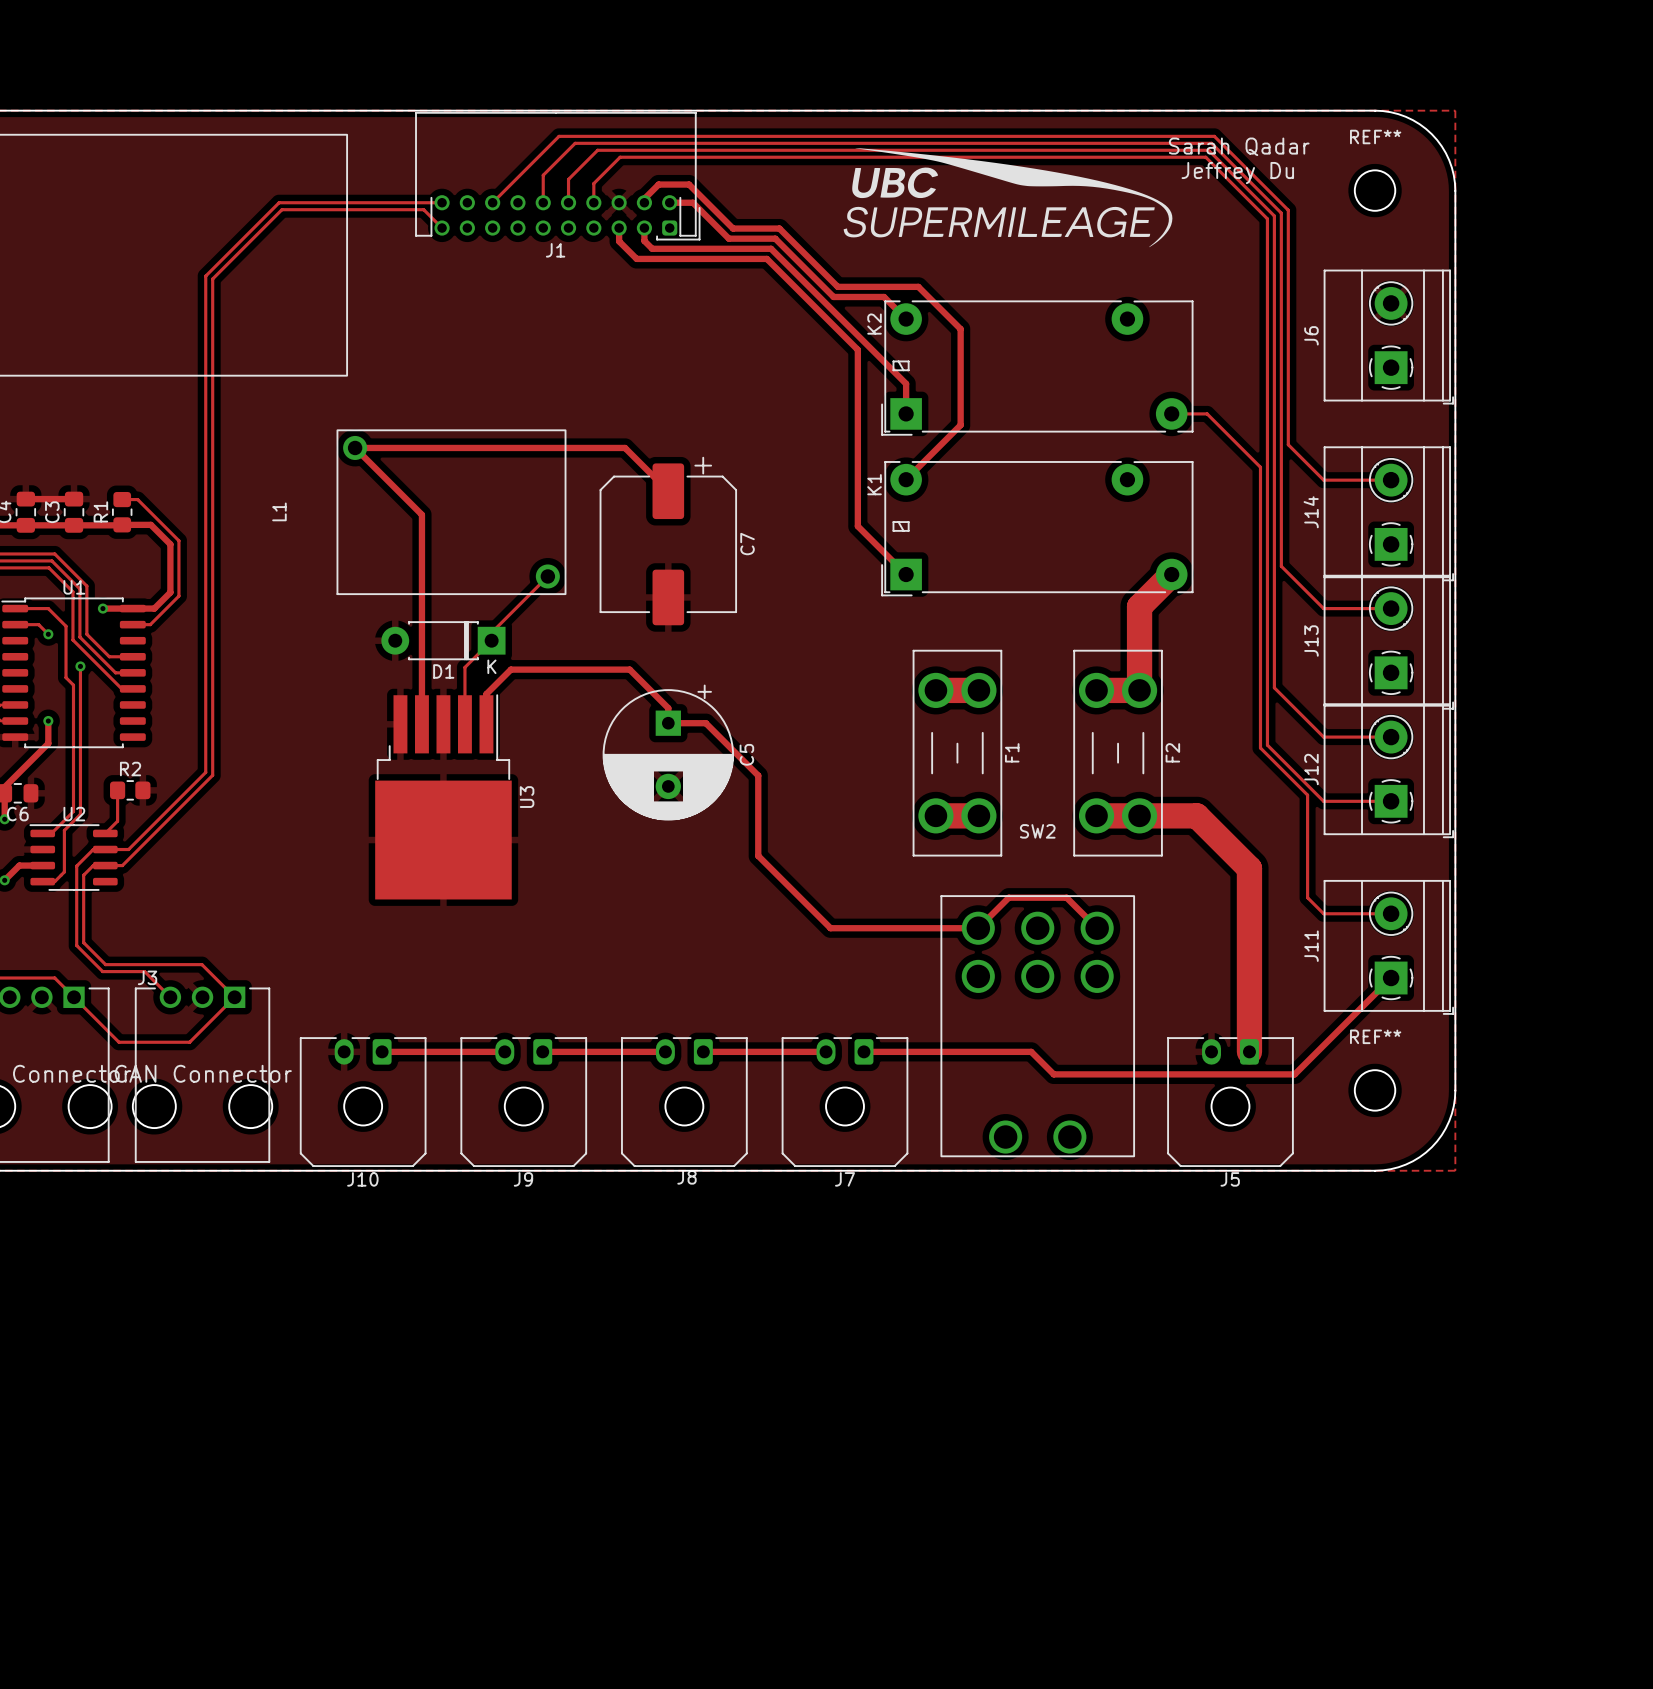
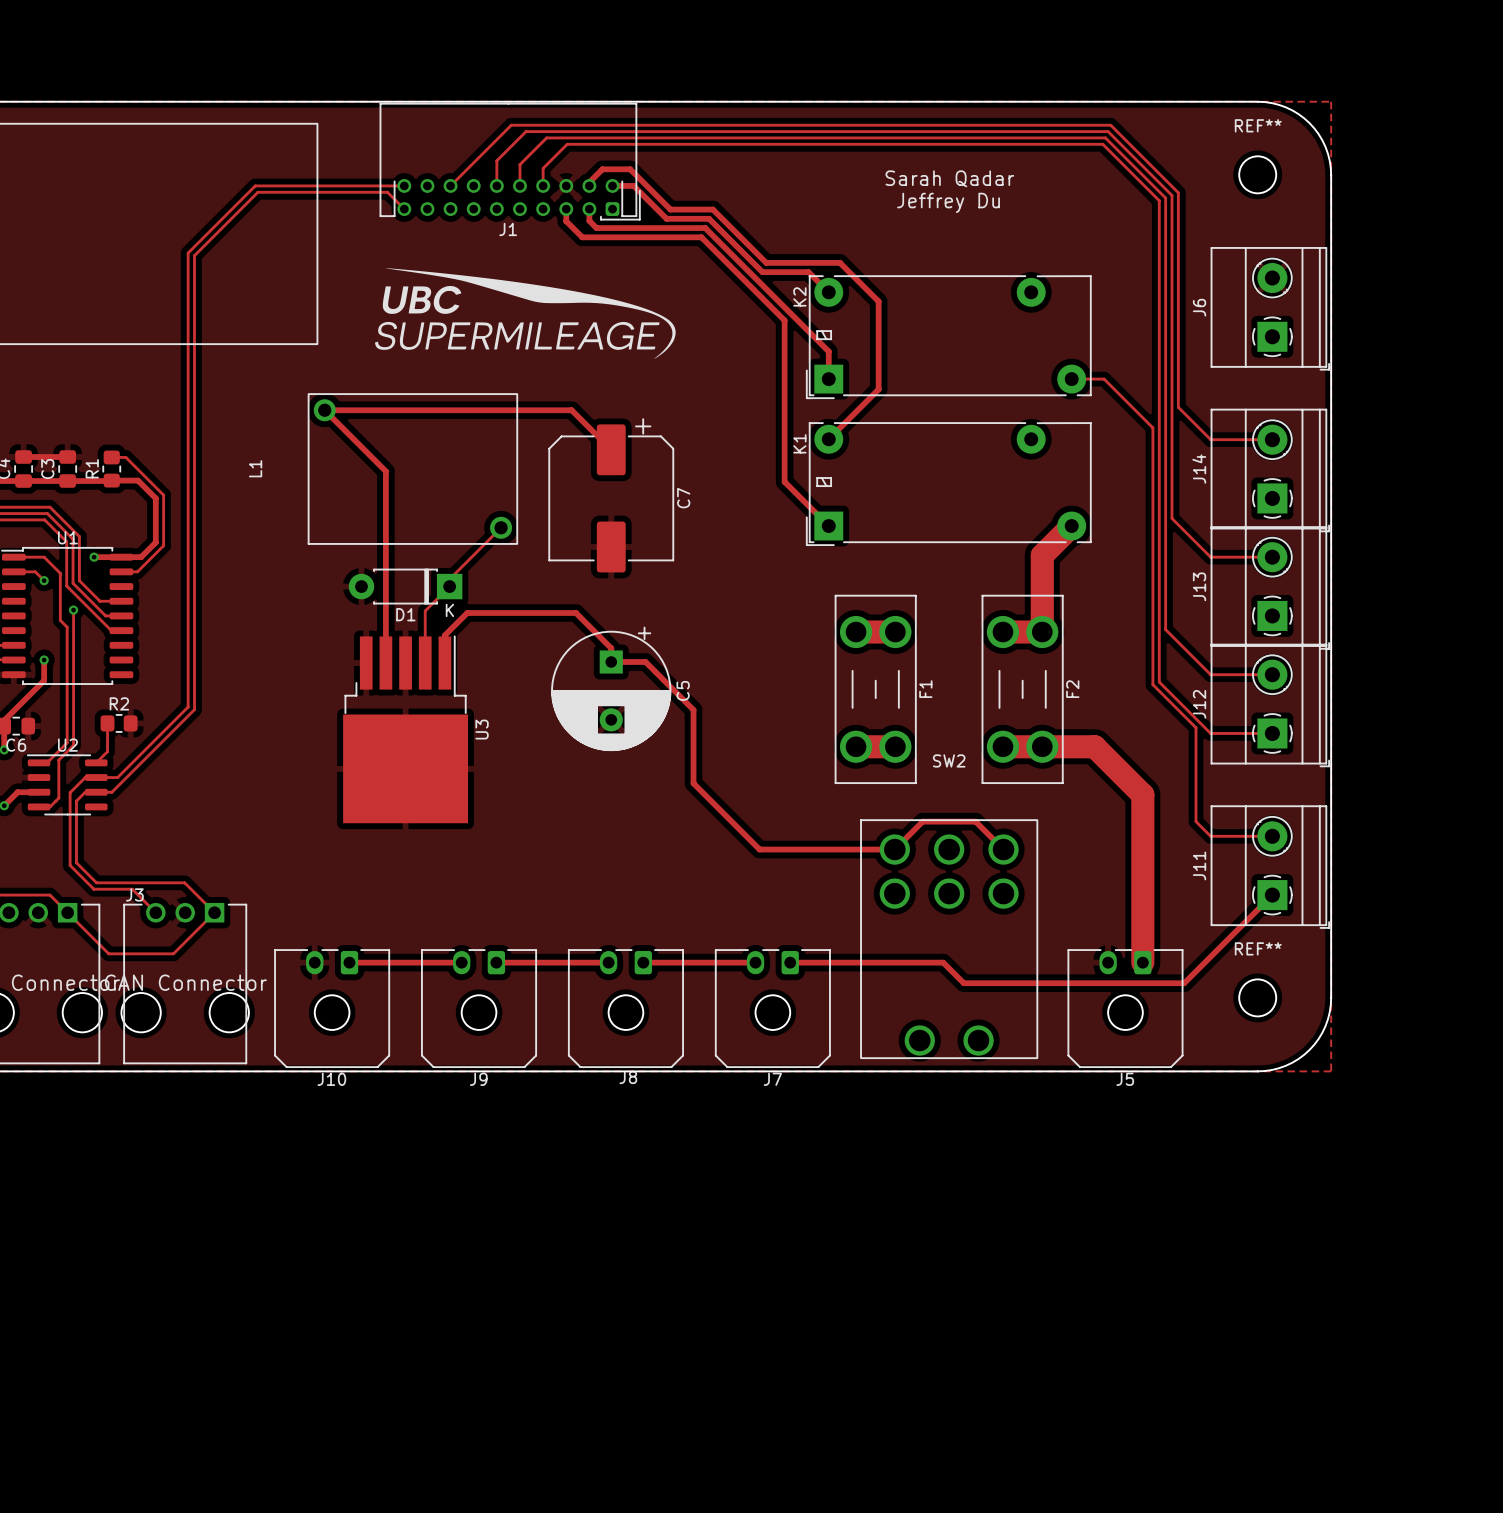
text position: Sarah Qadar (1239, 146) -> Sarah Qadar (949, 178)
drawing: [843, 148, 1173, 248] -> none
text position: Jeffrey Du (1237, 173) -> Jeffrey Du (948, 202)
drawing: none -> [374, 268, 676, 359]

